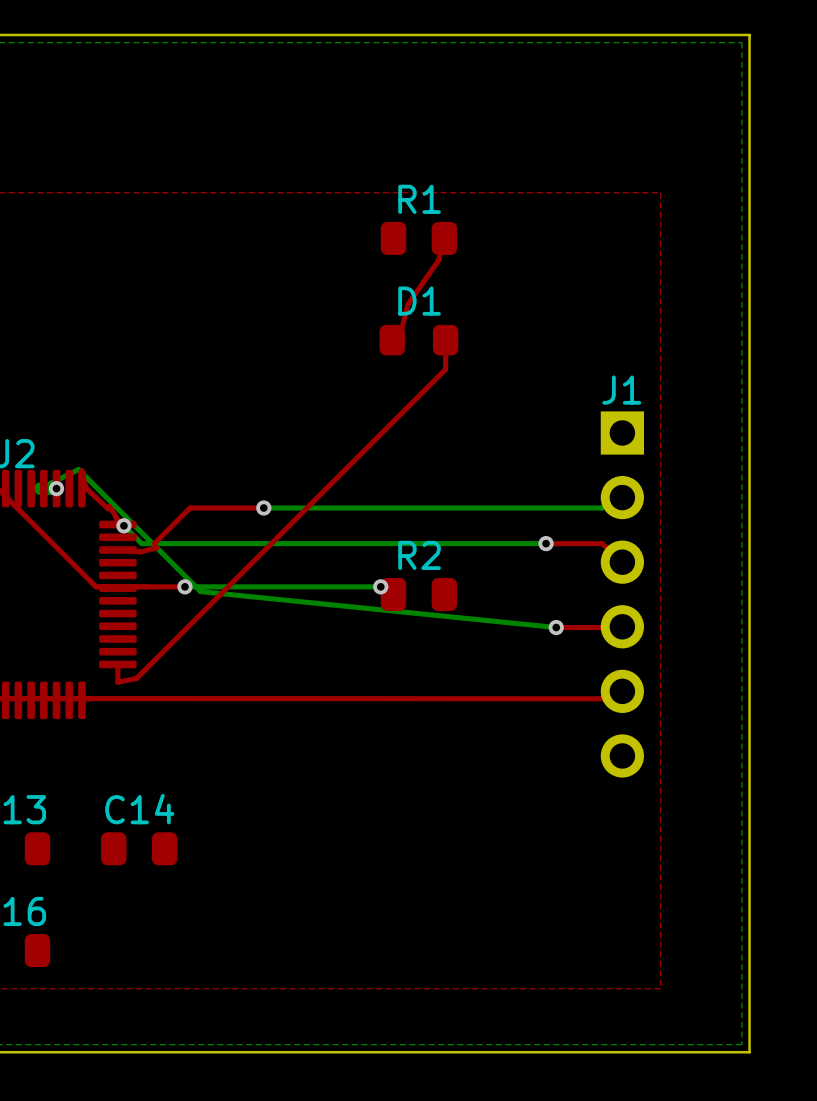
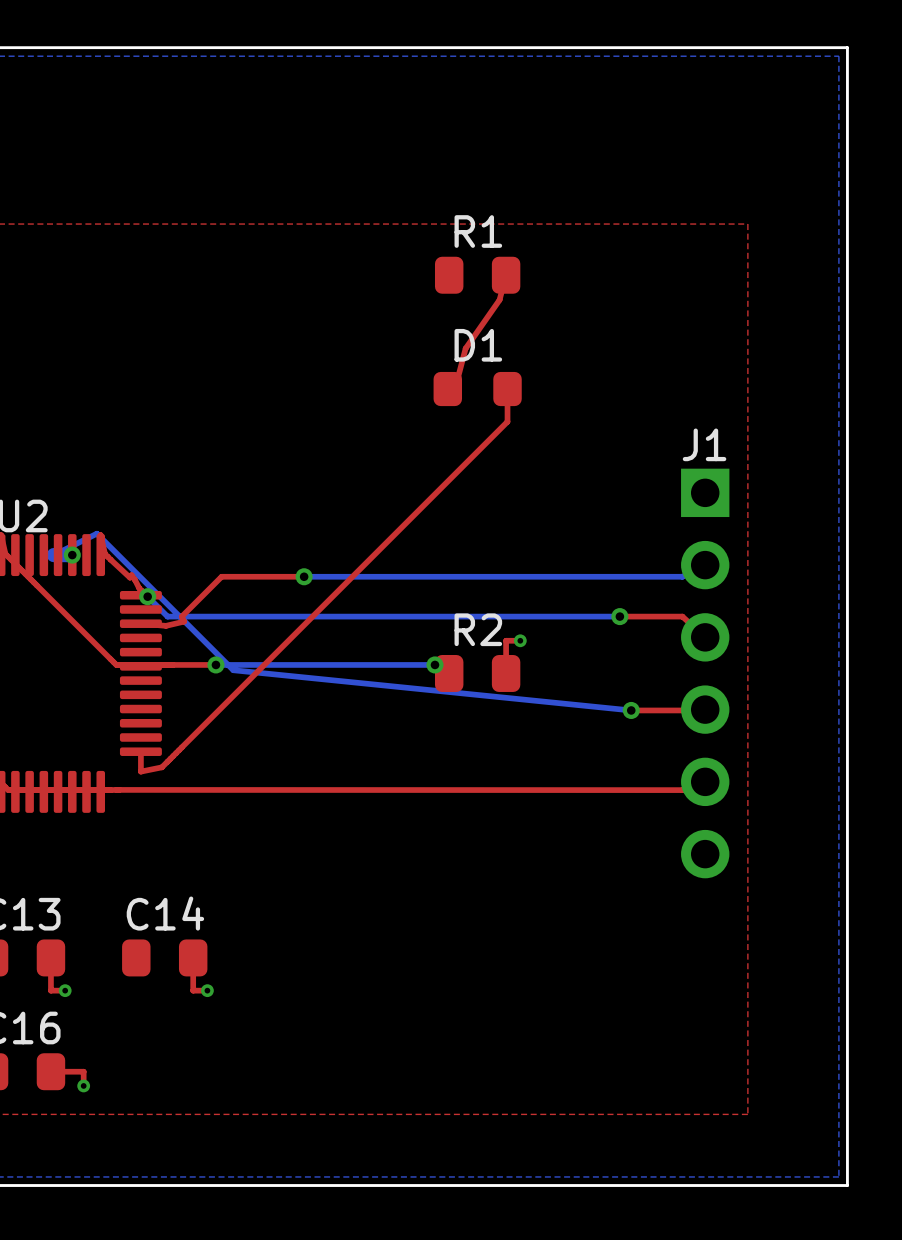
top track: none -> (520, 640) (506, 640) (506, 673)
via: none -> (520, 640)
top track: none -> (50, 957) (50, 990) (65, 990)
top track: none -> (193, 957) (193, 990) (207, 990)
via: none -> (65, 990)
via: none -> (207, 990)
top track: none -> (50, 1071) (83, 1071) (83, 1085)
via: none -> (83, 1085)

